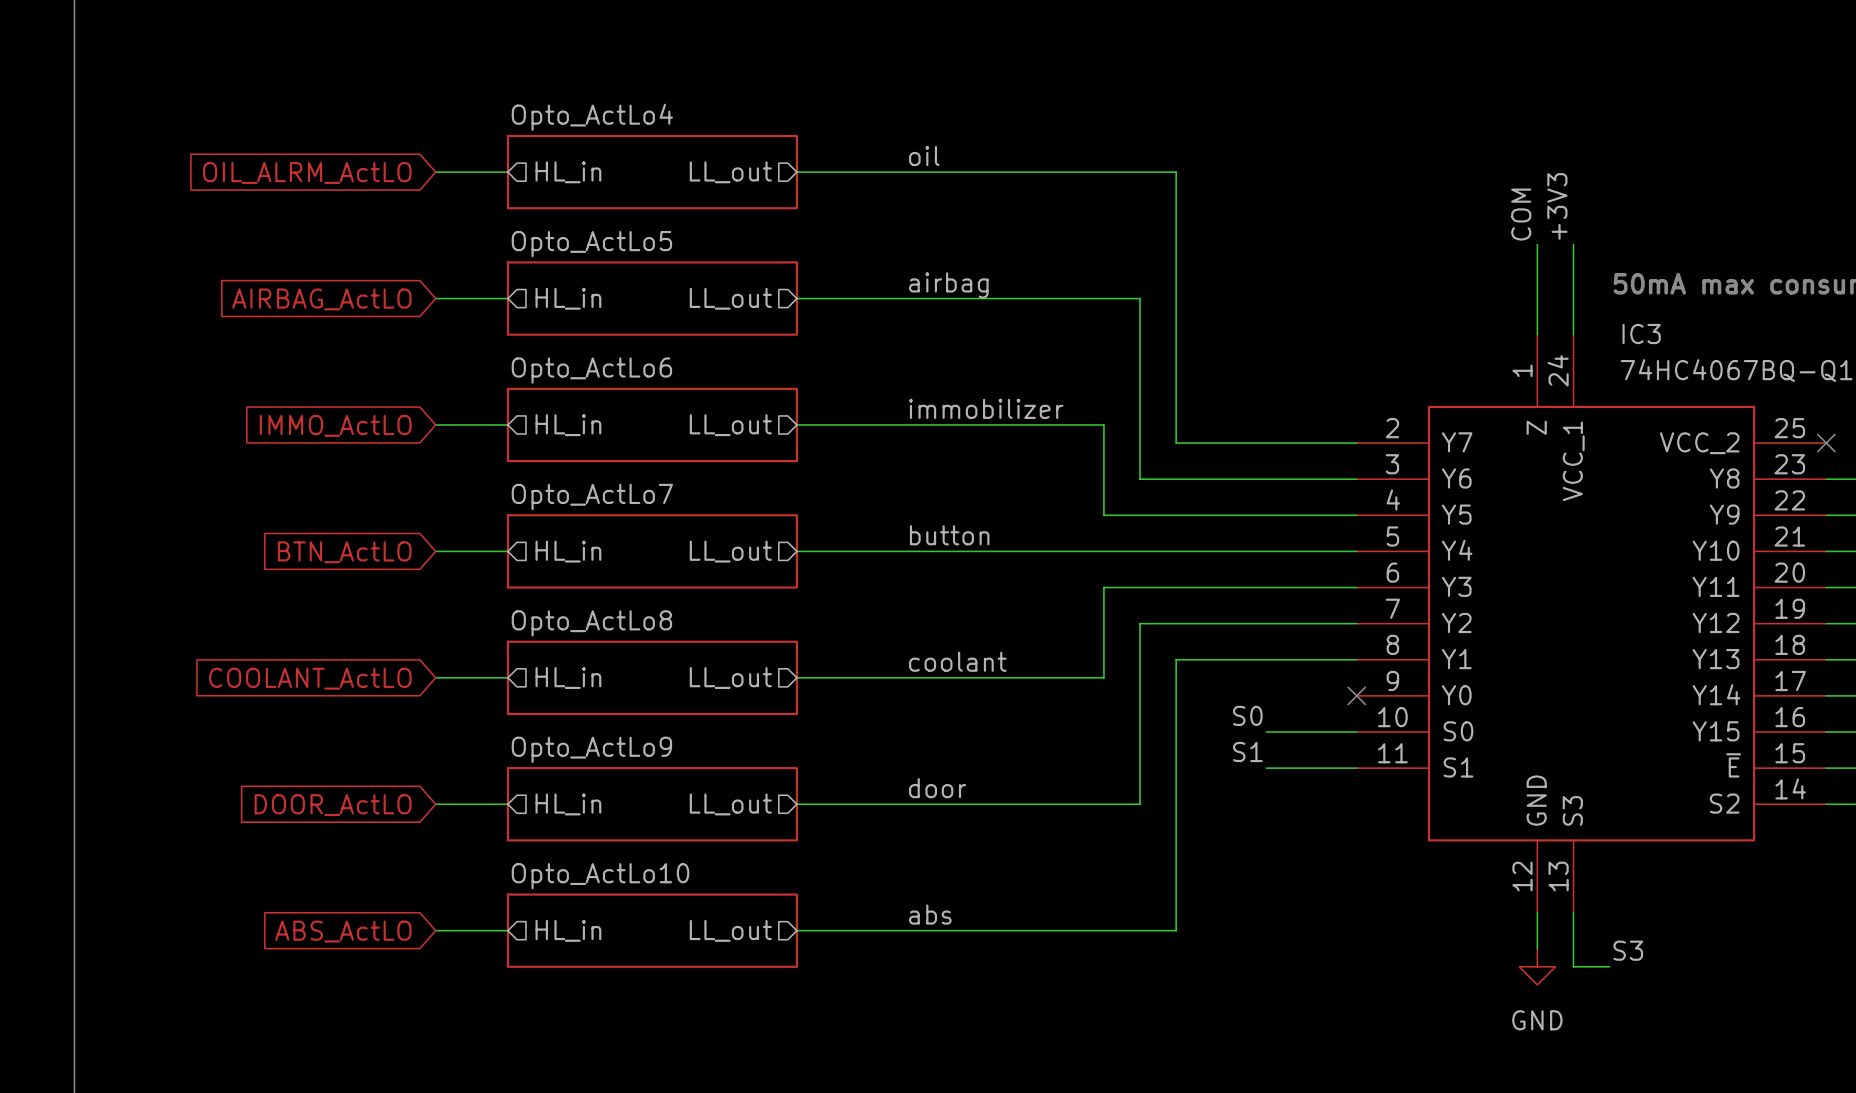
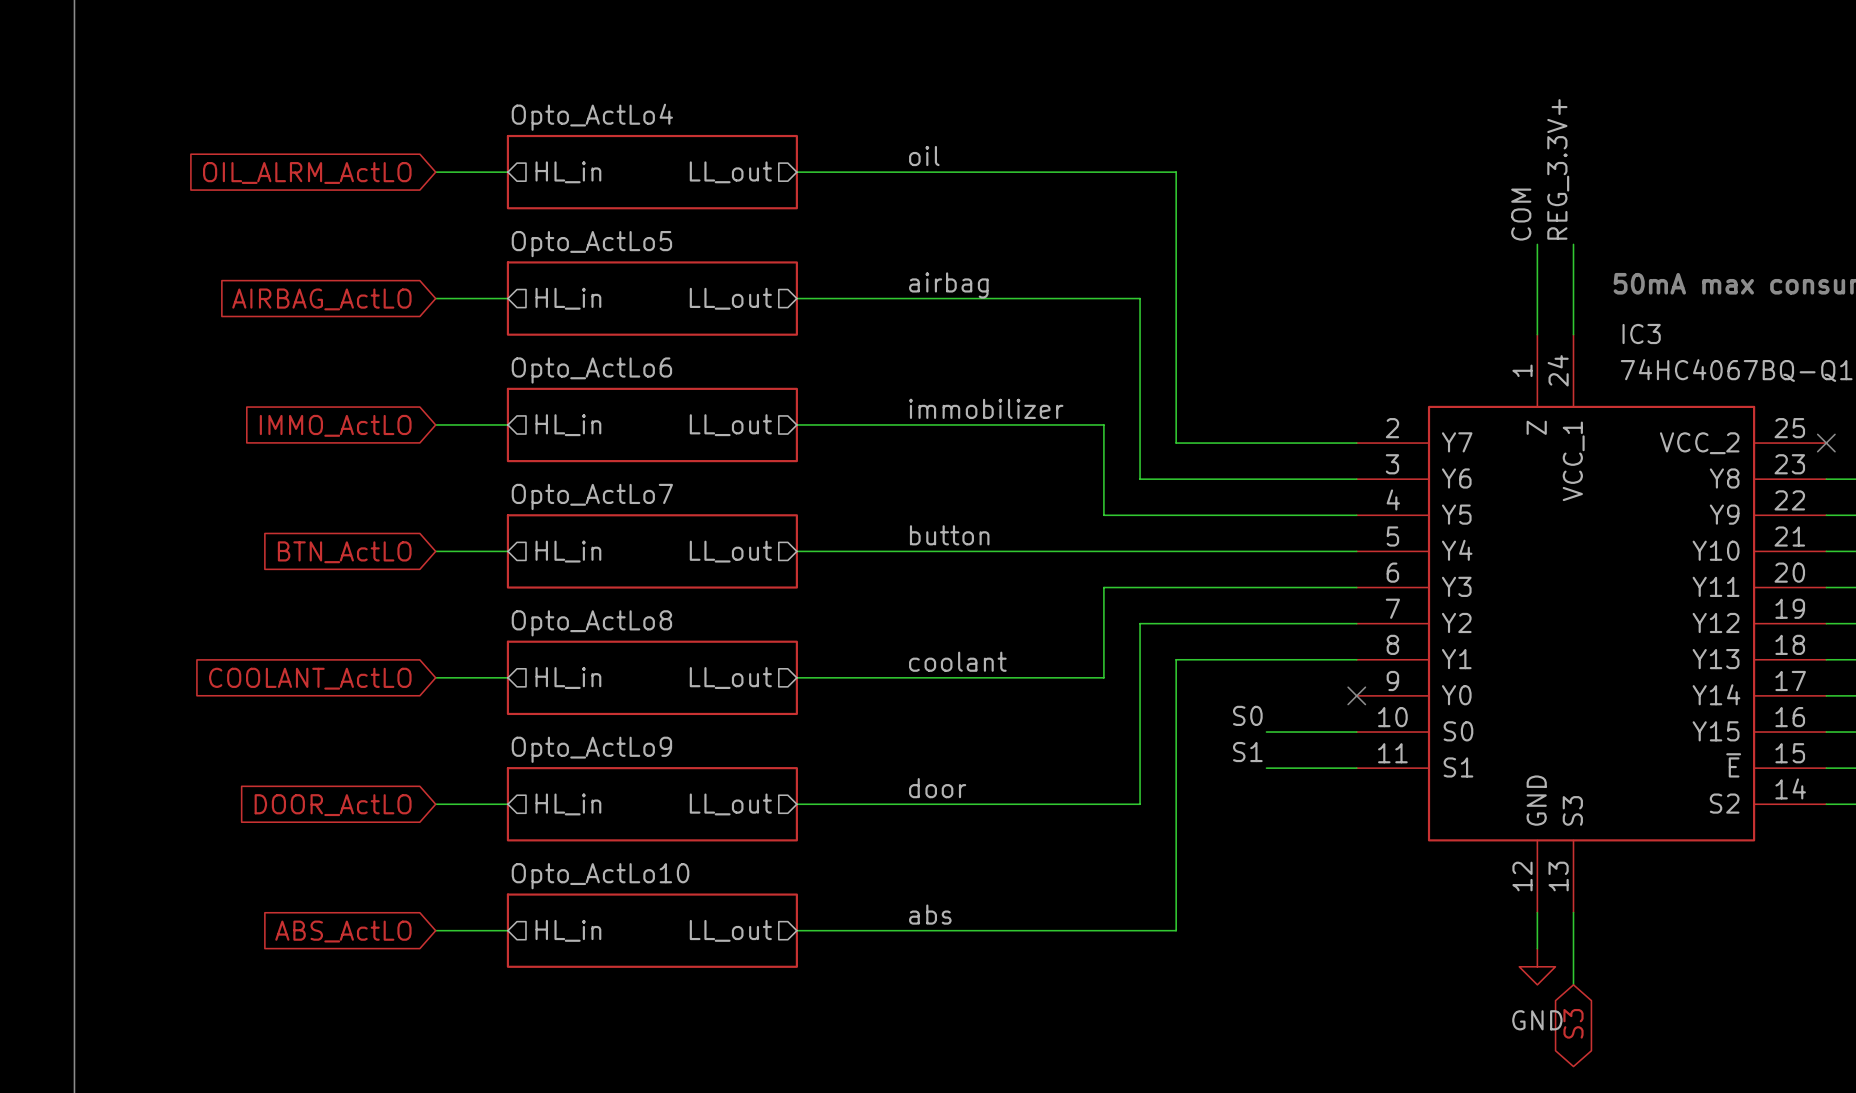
label: +3V3 (1557, 206) -> REG_3.3V+ (1558, 169)
label: S3 (1628, 950) -> none
wire: (1573, 966) (1609, 966) -> (1573, 966) (1573, 984)
global label: none -> S3 (1573, 1023)

